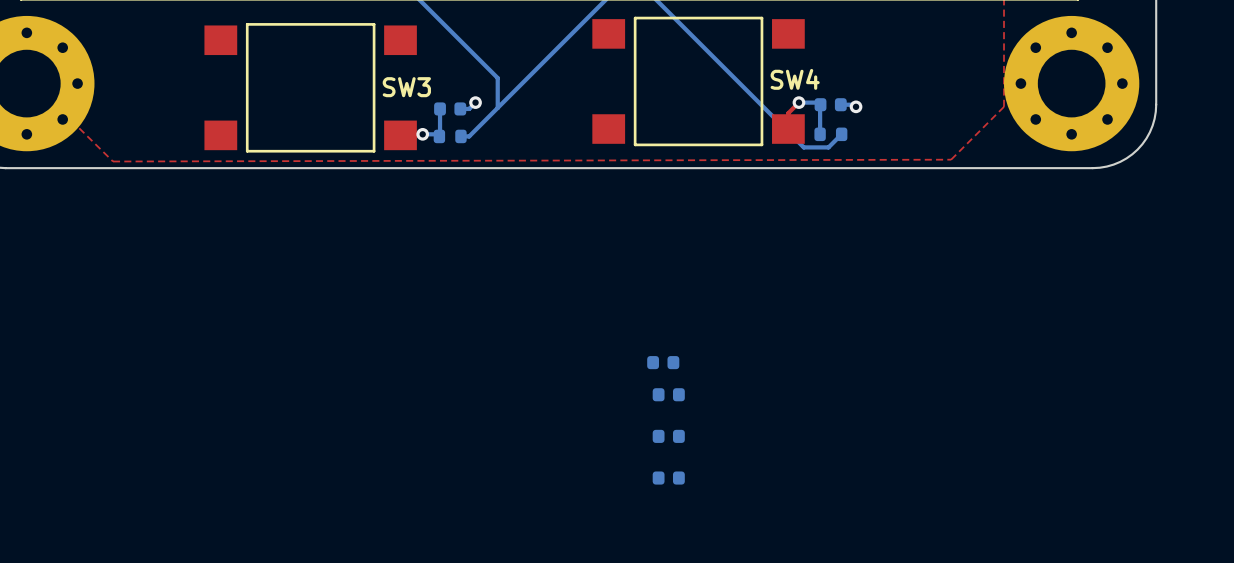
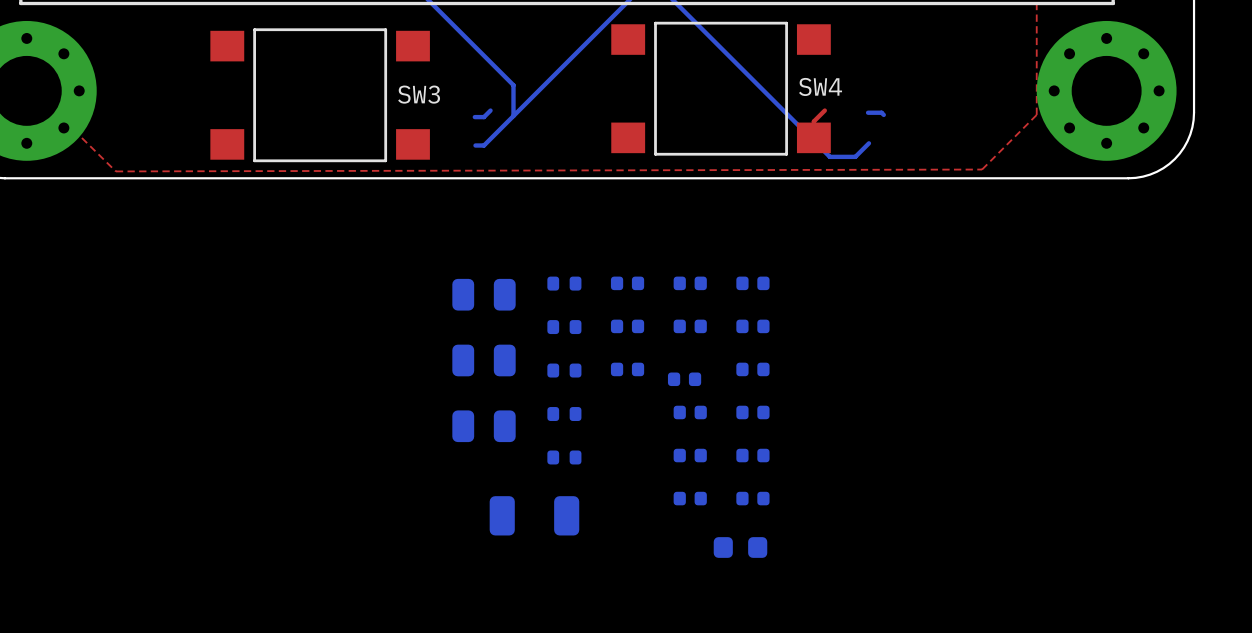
via: (475, 102) -> none
bottom track: (798, 102) (818, 102) (820, 104) (820, 134) -> none
via: (798, 102) -> none
part: (830, 104) -> none
via: (856, 106) -> none
bottom track: (440, 108) (440, 135) (422, 134) -> none
part: (450, 108) -> none
via: (422, 134) -> none
part: (830, 134) -> none
part: (450, 136) -> none
part: none -> (627, 283)
part: none -> (690, 283)
part: none -> (752, 283)
part: none -> (564, 283)
part: none -> (484, 294)
part: none -> (627, 326)
part: none -> (690, 326)
part: none -> (752, 326)
part: none -> (564, 327)
part: none -> (484, 360)
part: none -> (627, 369)
part: none -> (752, 369)
part: none -> (564, 370)
part: none -> (752, 412)
part: none -> (564, 414)
part: none -> (484, 426)
part: none -> (752, 455)
part: none -> (564, 457)
part: none -> (752, 498)
part: none -> (534, 515)
part: none -> (740, 547)

